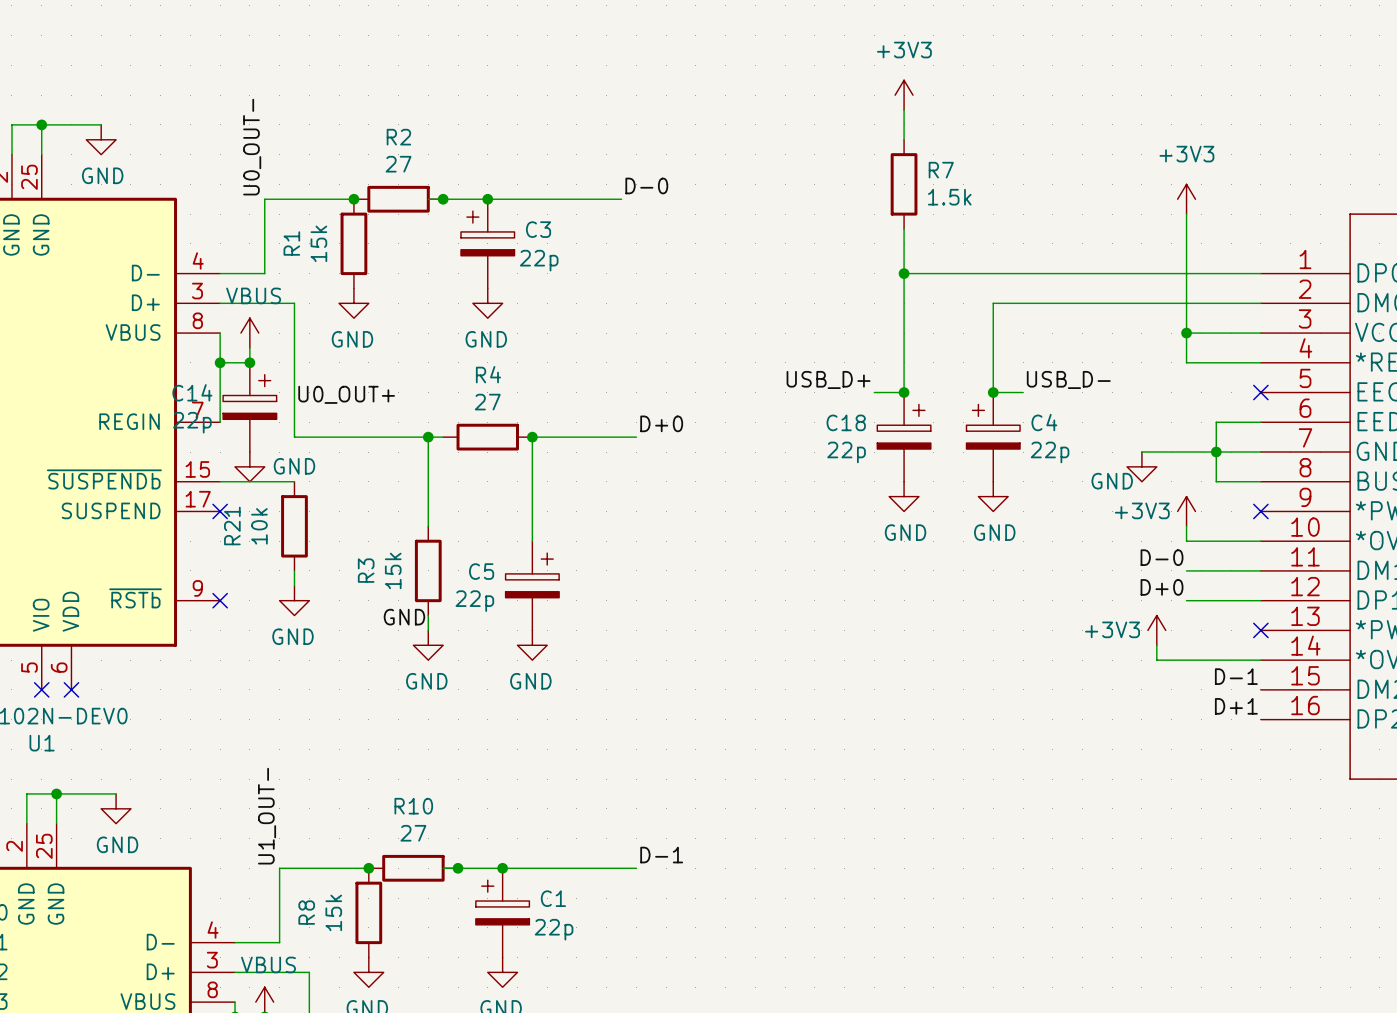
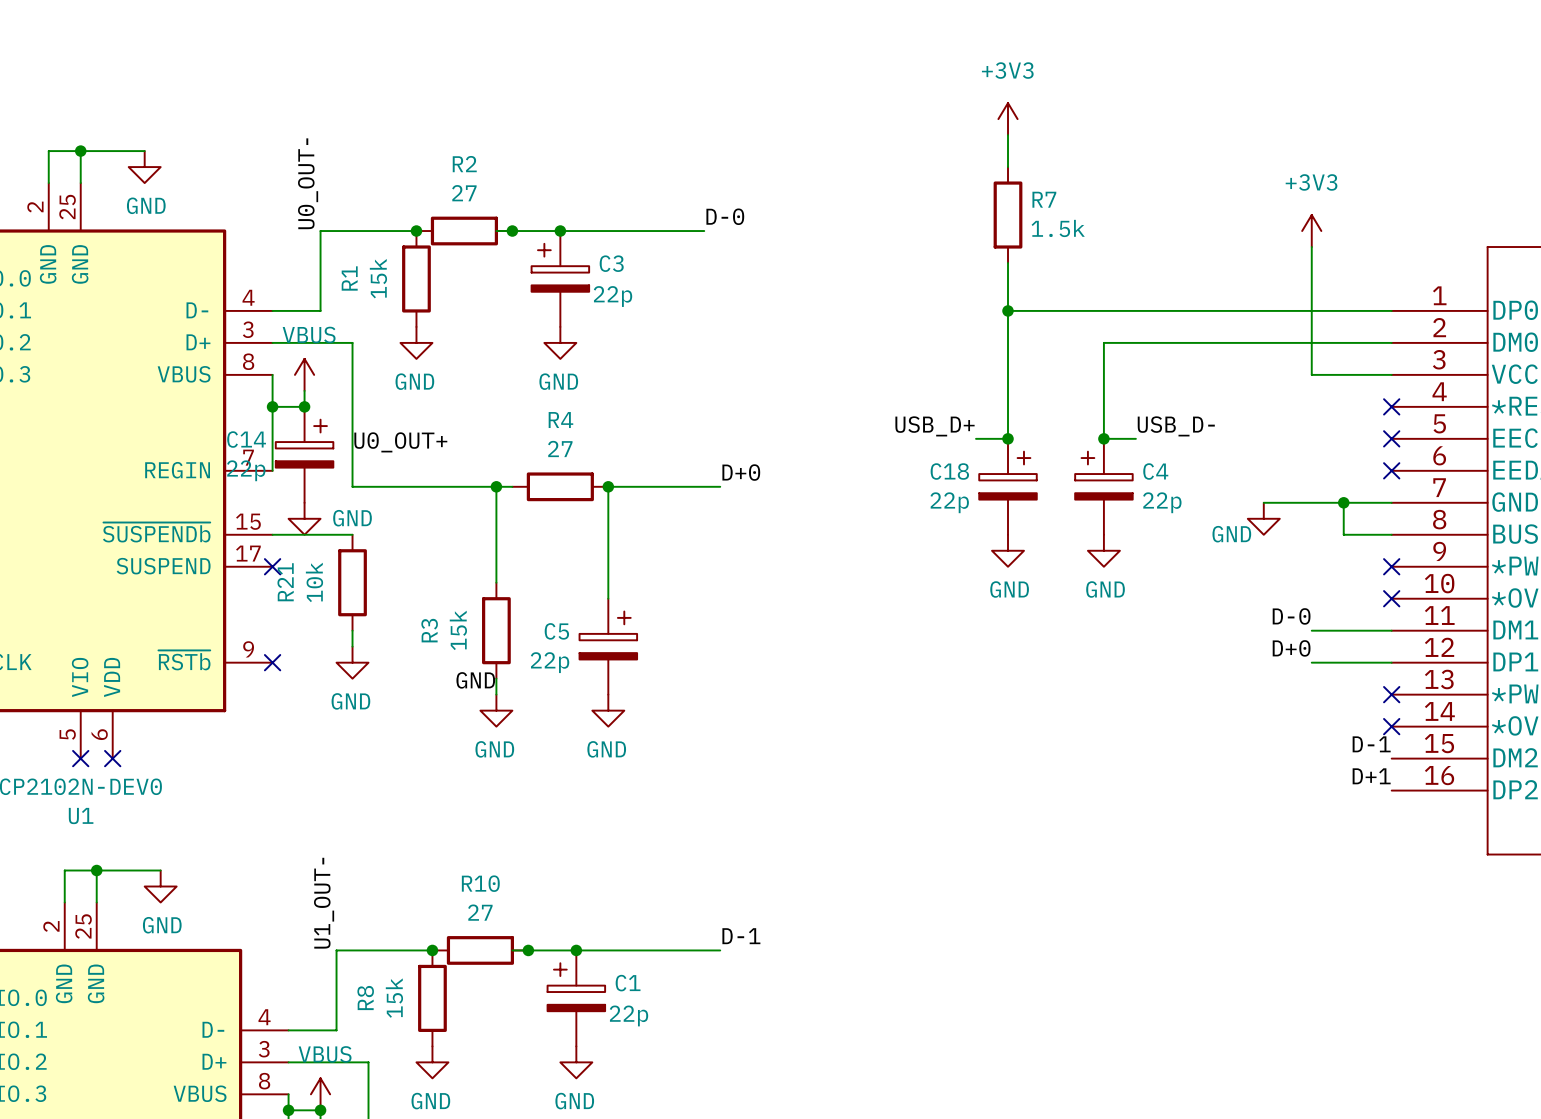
wire: (1186, 333) (1186, 362) (1260, 362) -> none
junction: (1186, 333) -> none
no-connect mark: none -> (1391, 406)
wire: (1260, 422) (1216, 422) (1216, 452) -> none
no-connect mark: none -> (1391, 470)
power symbol: +3V3 (1186, 511) -> none
wire: (1186, 526) (1186, 541) (1260, 541) -> none
no-connect mark: none -> (1391, 598)
power symbol: +3V3 (1156, 630) -> none
wire: (1156, 645) (1156, 660) (1260, 660) -> none
no-connect mark: none -> (1391, 726)

